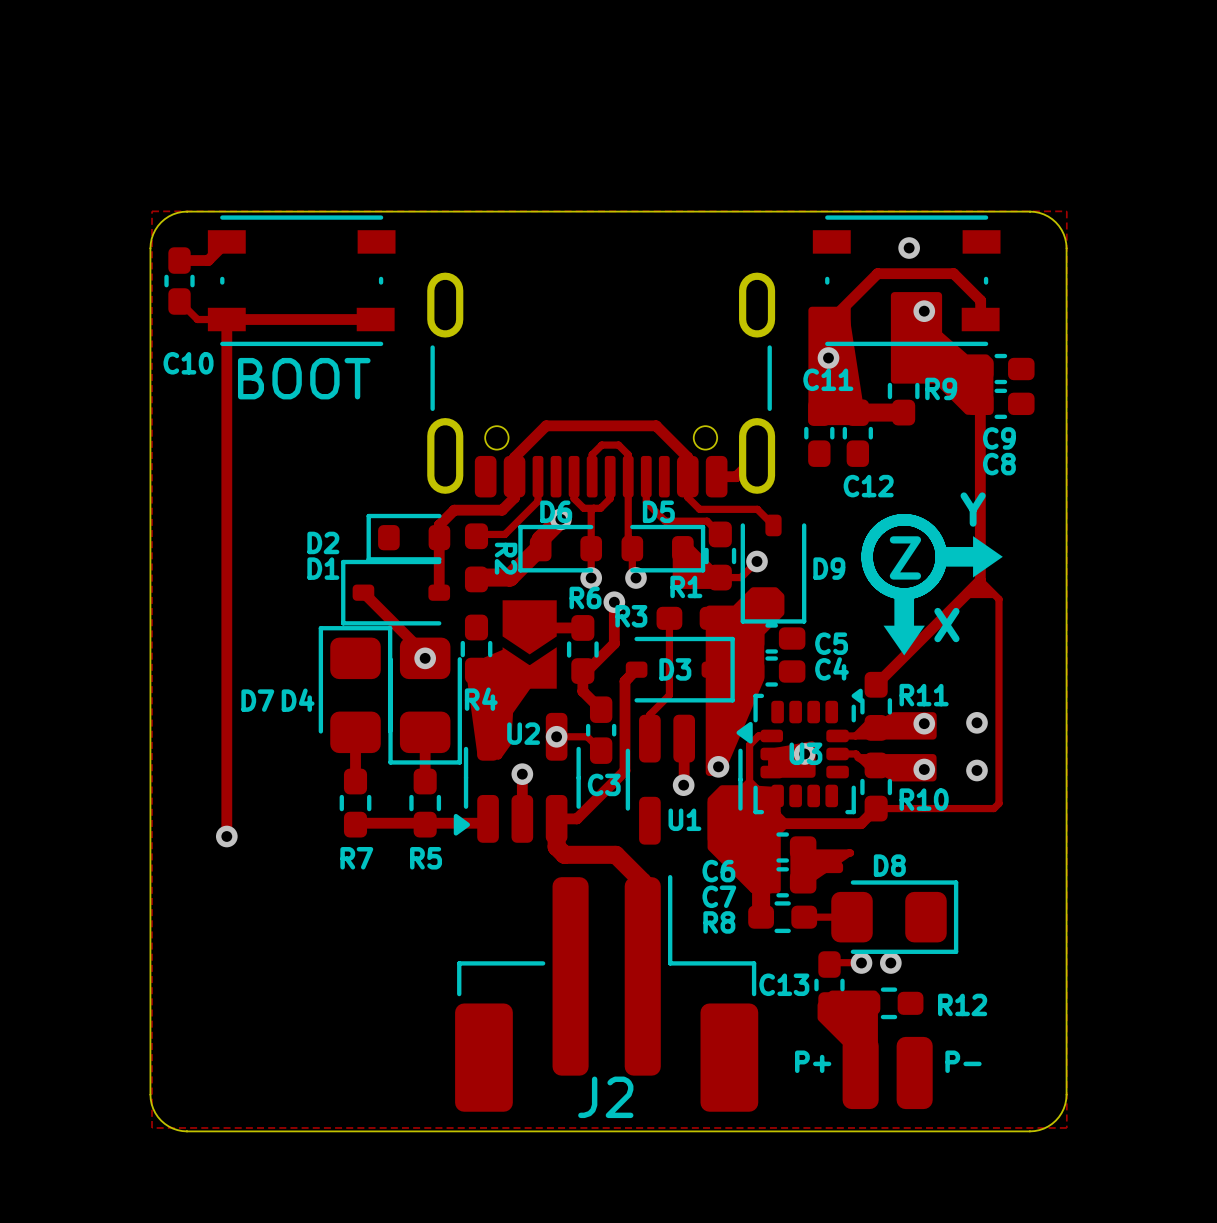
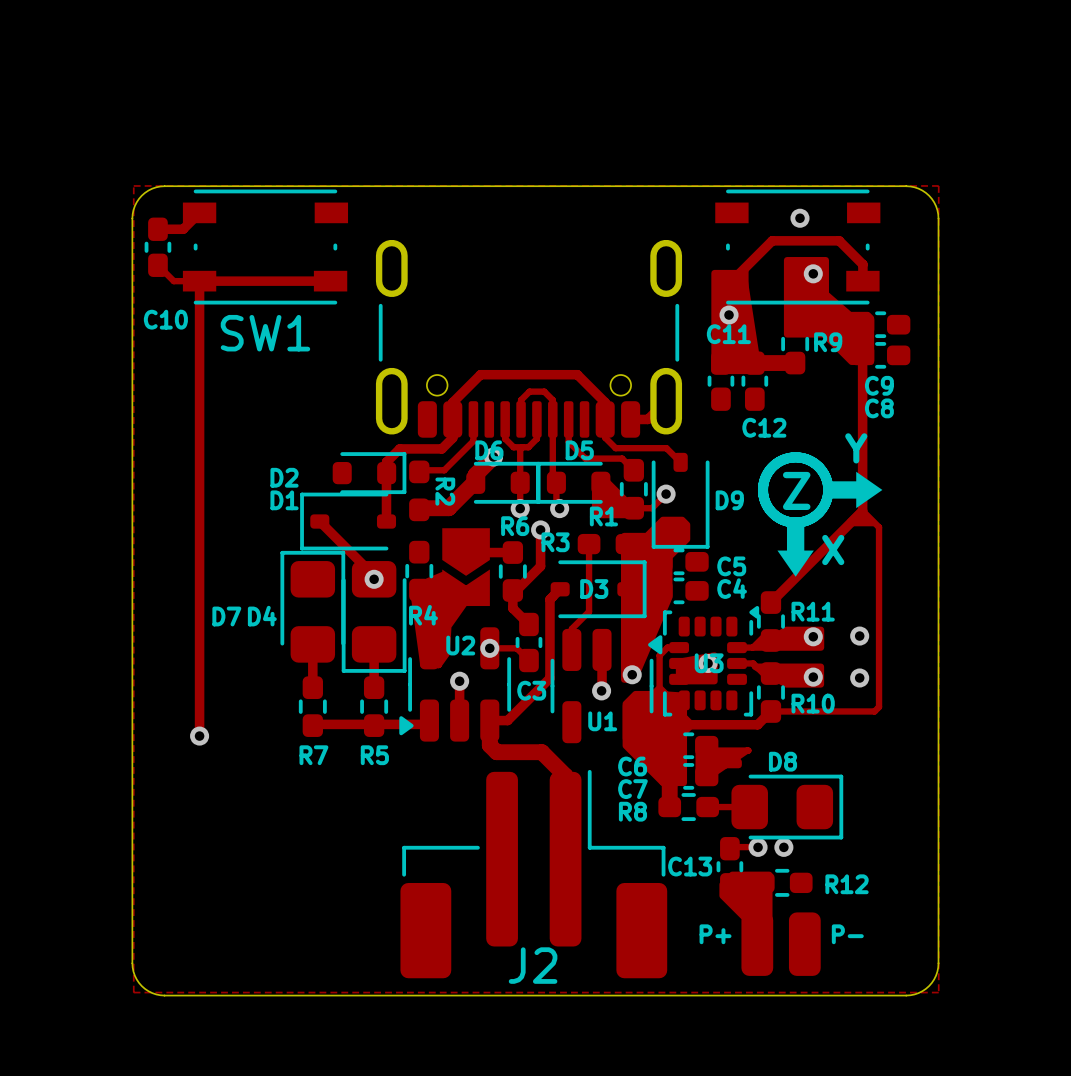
BOOT name: BOOT (304, 378) -> SW1 (265, 333)
part rotation: 0° (408, 537) -> 180° (369, 473)
part rotation: 0° (560, 548) -> 180° (503, 482)
part rotation: 0° (663, 548) -> 180° (573, 482)

